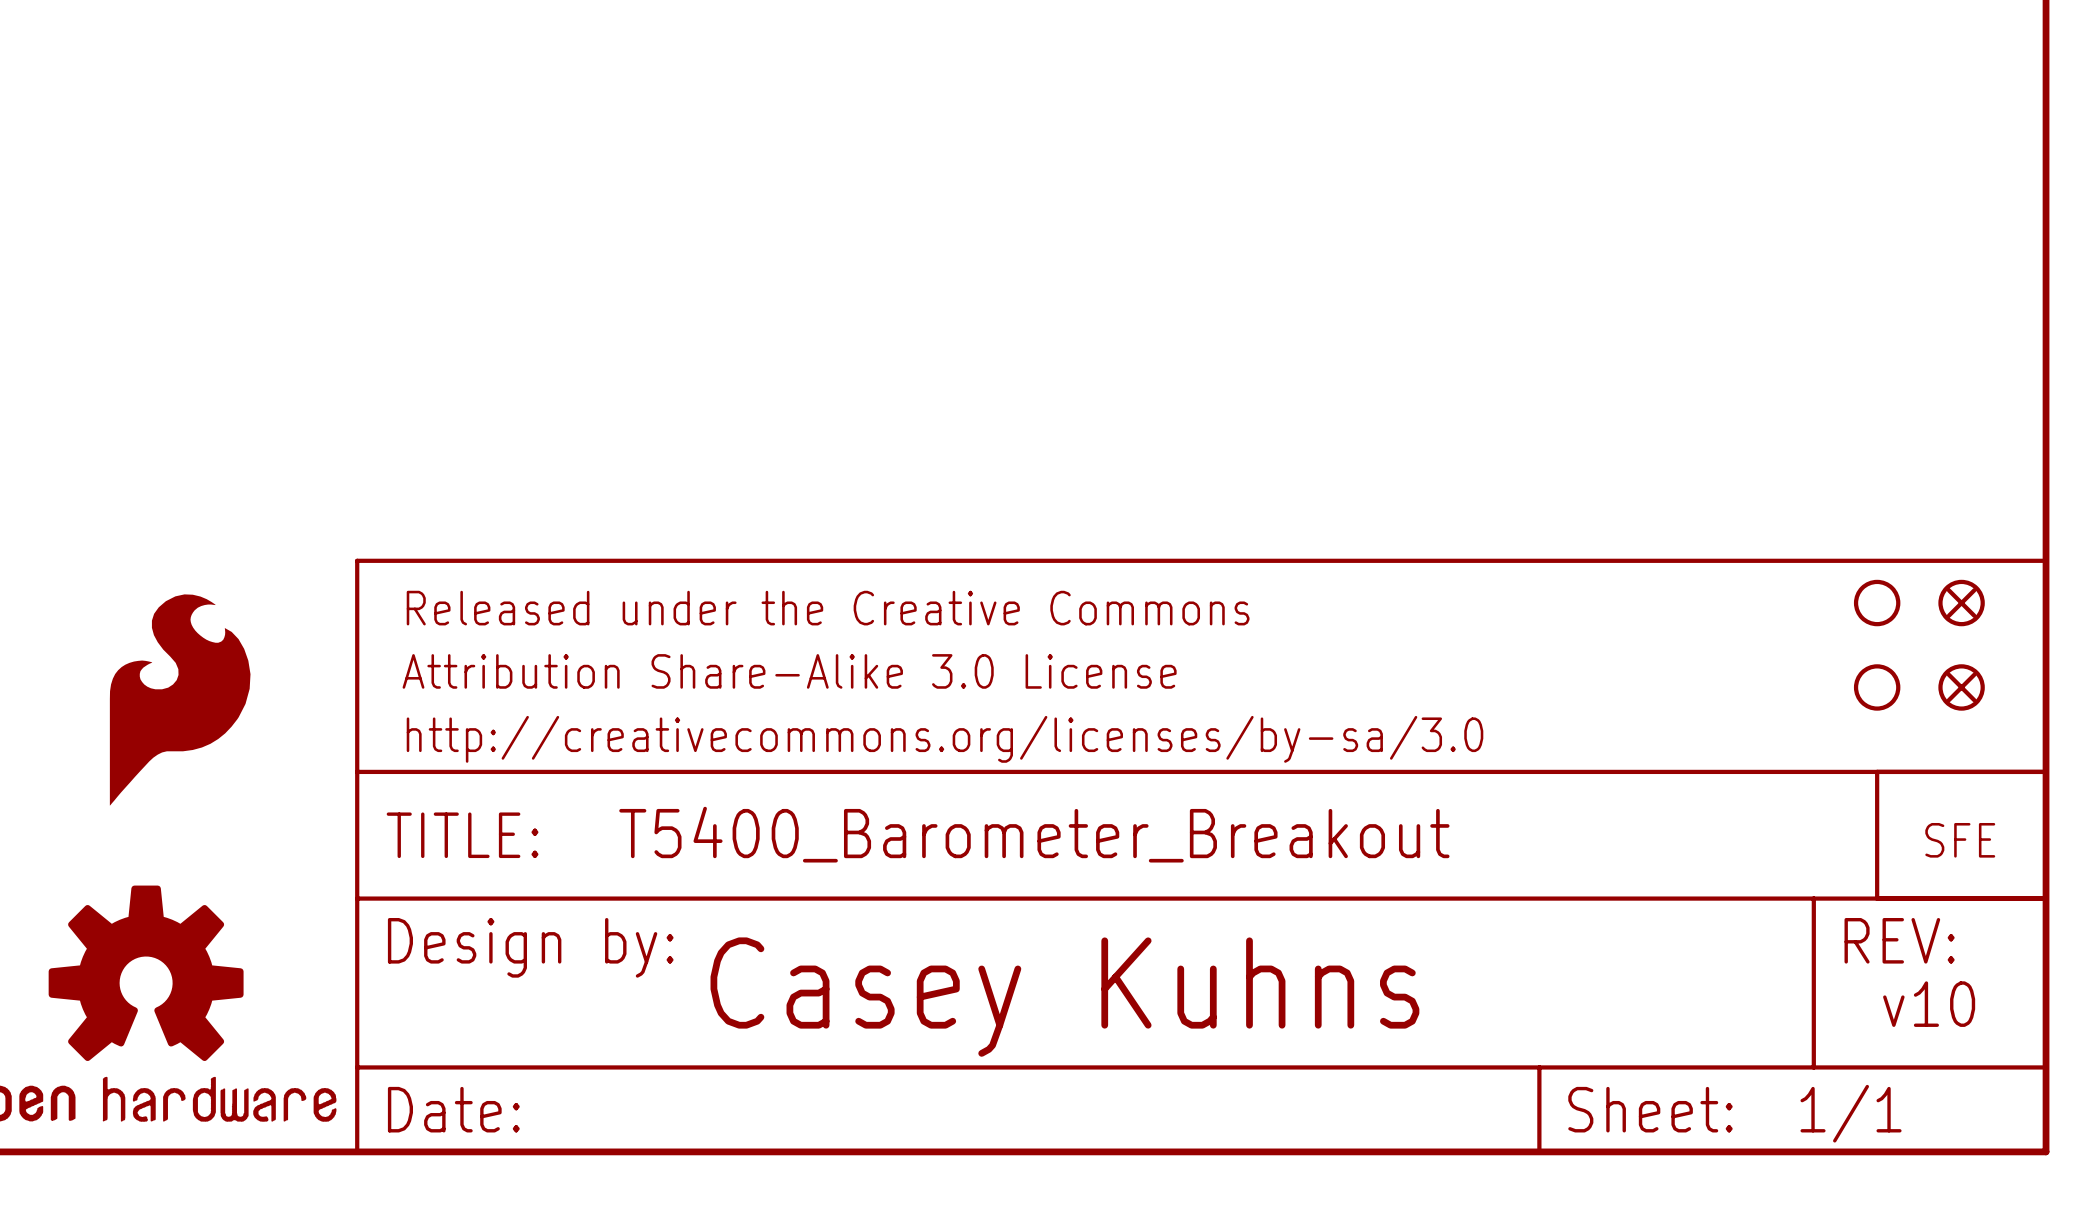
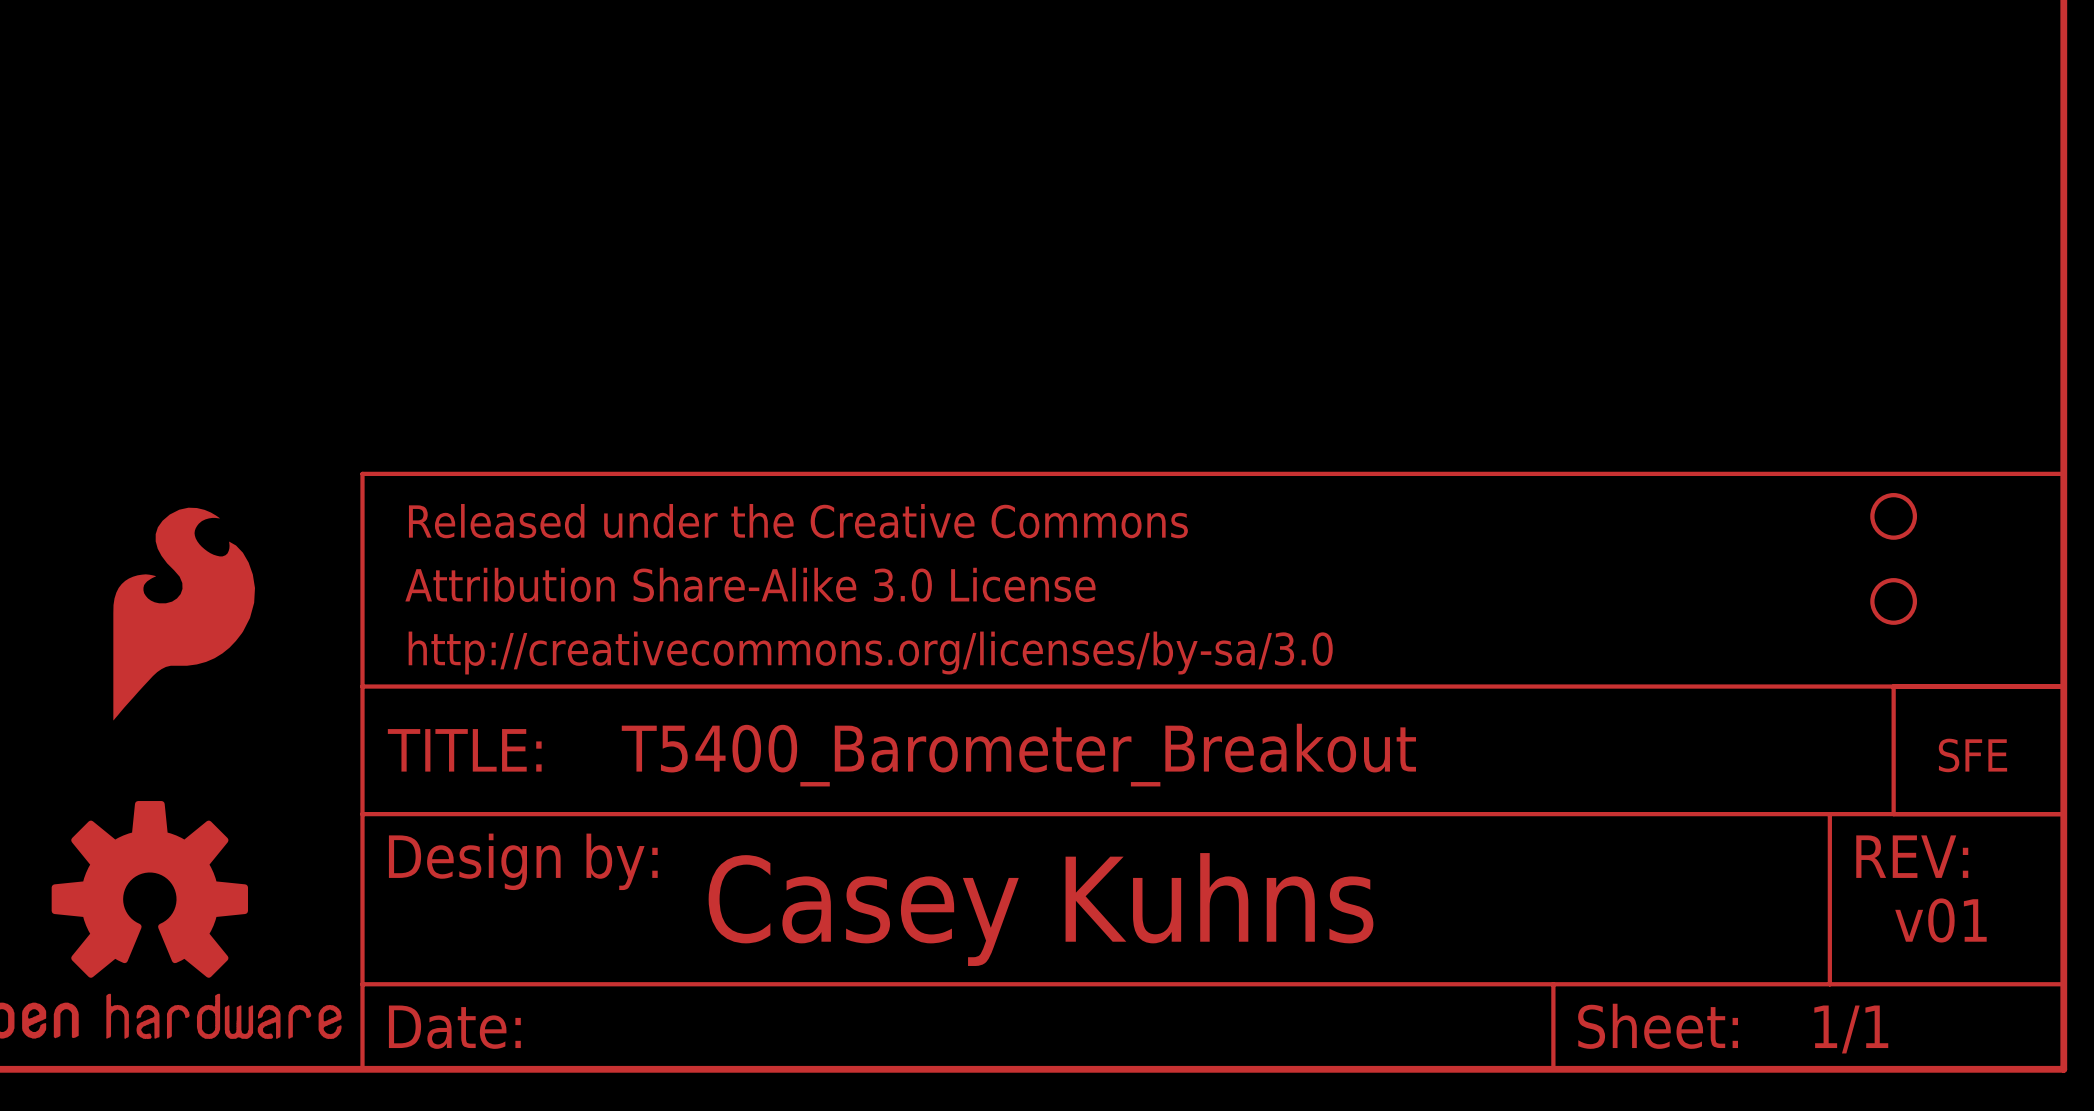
part: (1961, 603) -> none
part: (1961, 687) -> none
text: v10 (1929, 1004) -> v01 (1940, 920)

